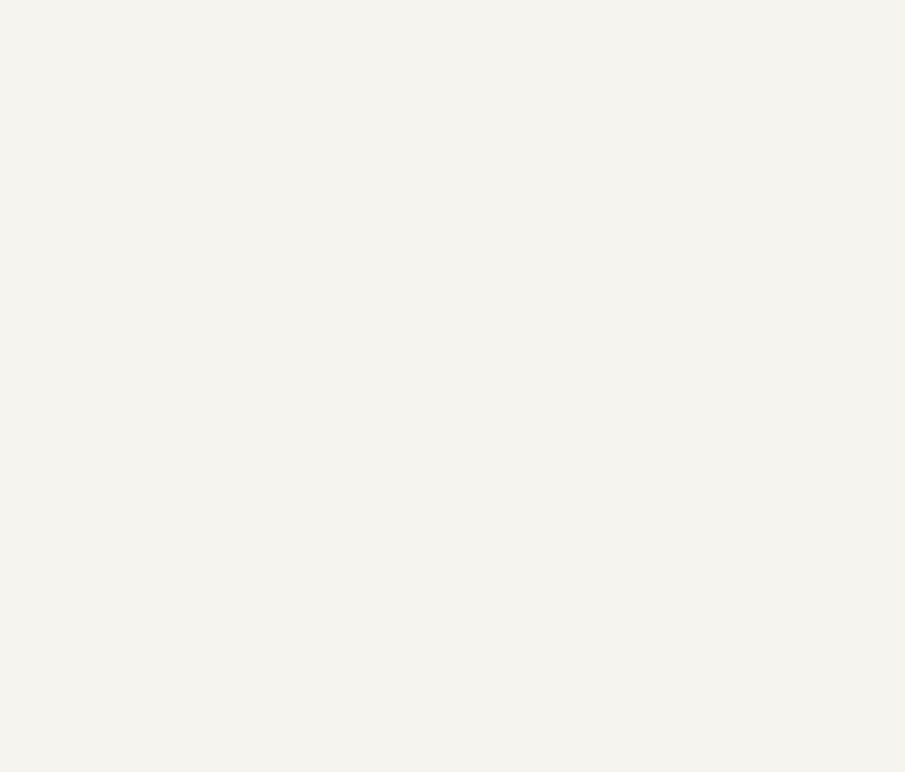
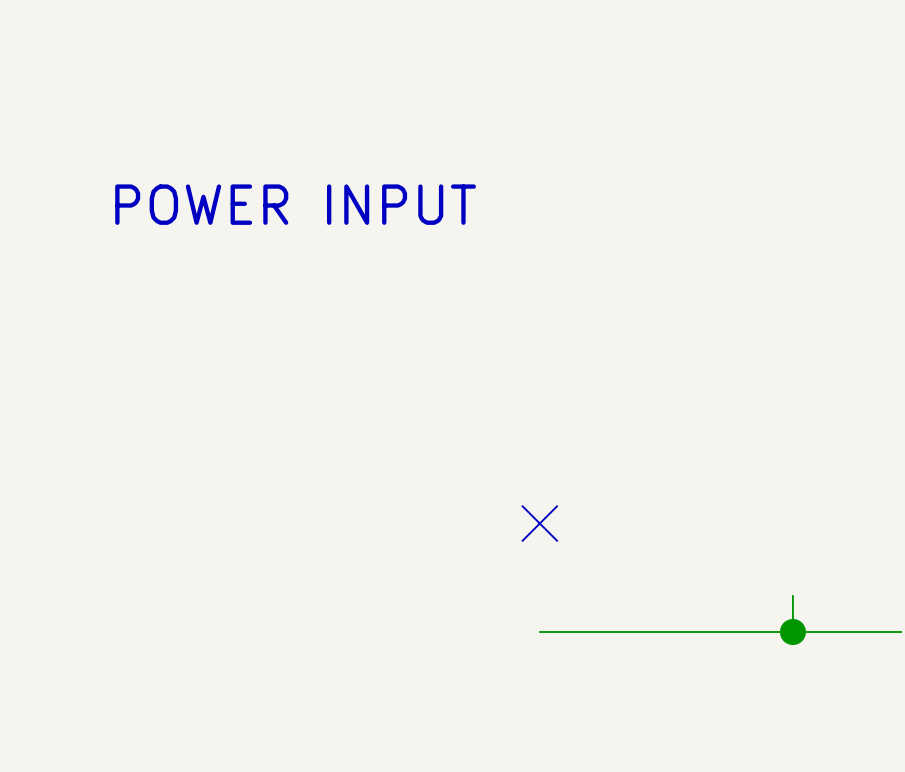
text: none -> POWER INPUT (295, 204)
no-connect mark: none -> (539, 523)
wire: none -> (792, 595) (792, 632)
wire: none -> (539, 632) (901, 632)
junction: none -> (792, 632)

